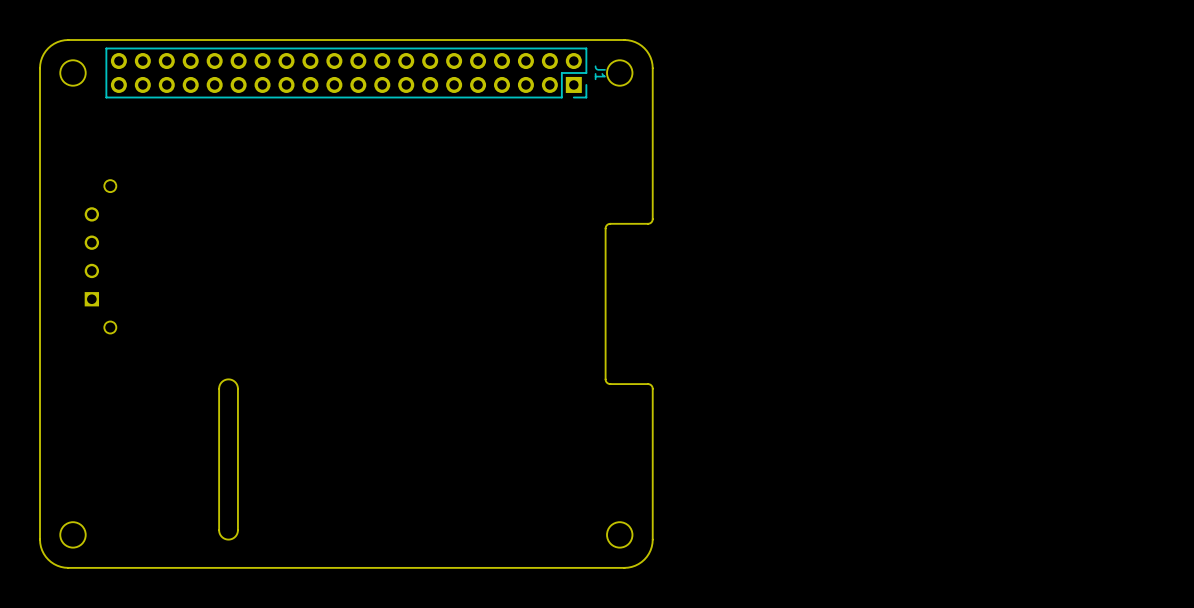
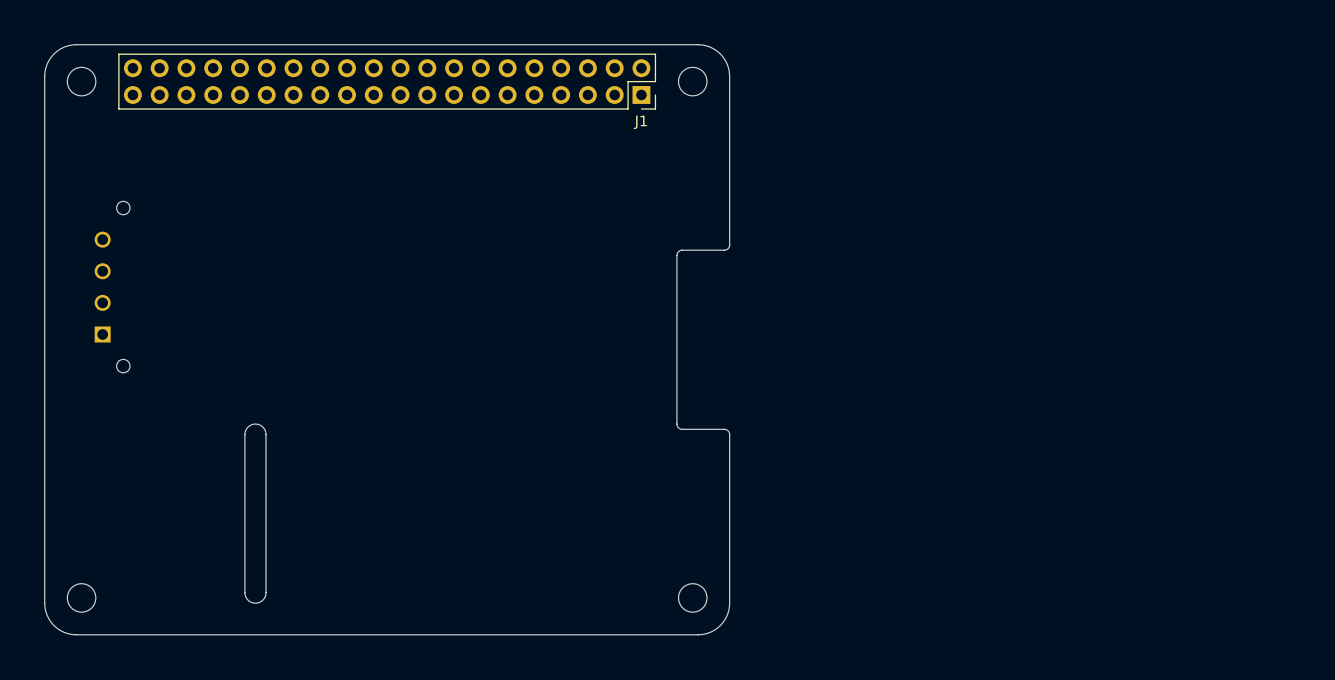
J1 name rotation: 0° (600, 72) -> 90° counterclockwise (640, 122)
J1 name position: J1 (600, 72) -> J1 (640, 122)

